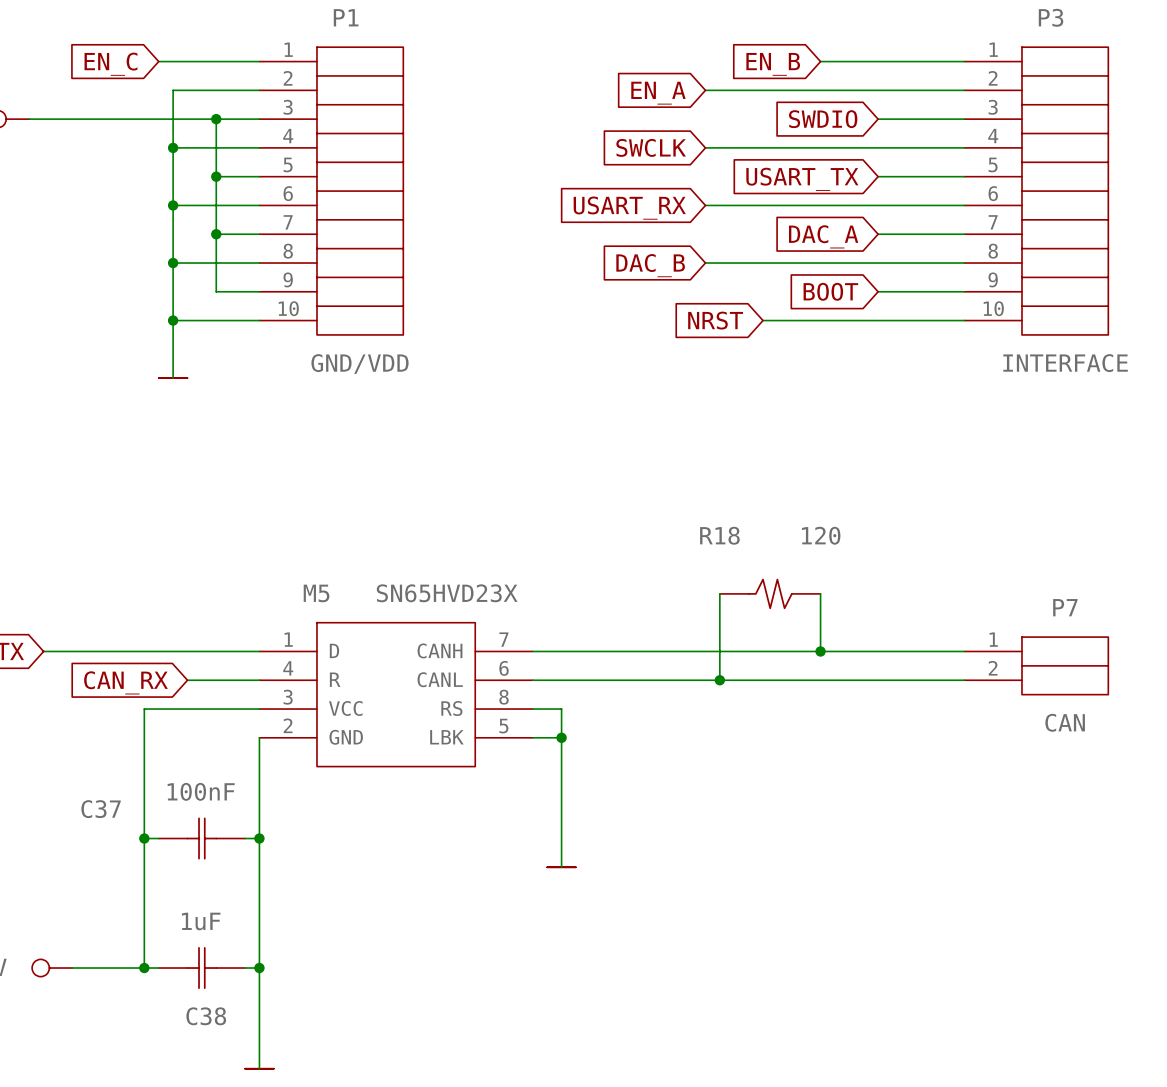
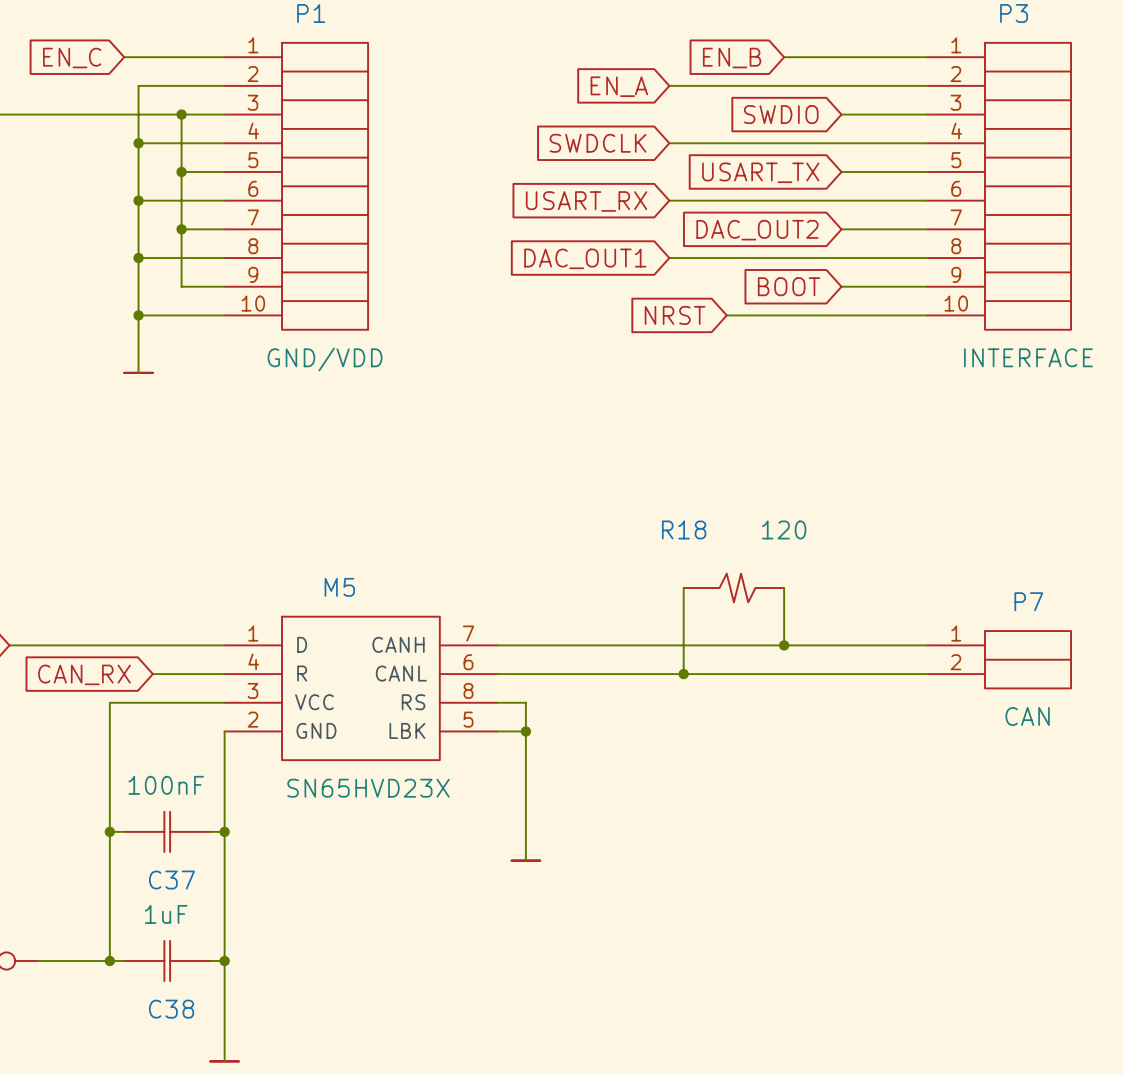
global label: SWCLK (651, 147) -> SWDCLK (598, 143)
global label: DAC_A (823, 236) -> DAC_OUT2 (757, 230)
global label: DAC_B (650, 265) -> DAC_OUT1 (585, 258)
M5 name position: M5 (316, 593) -> M5 (339, 587)
M5 value position: SN65HVD23X (447, 593) -> SN65HVD23X (368, 788)
C37 name position: C37 (101, 809) -> C37 (171, 880)

